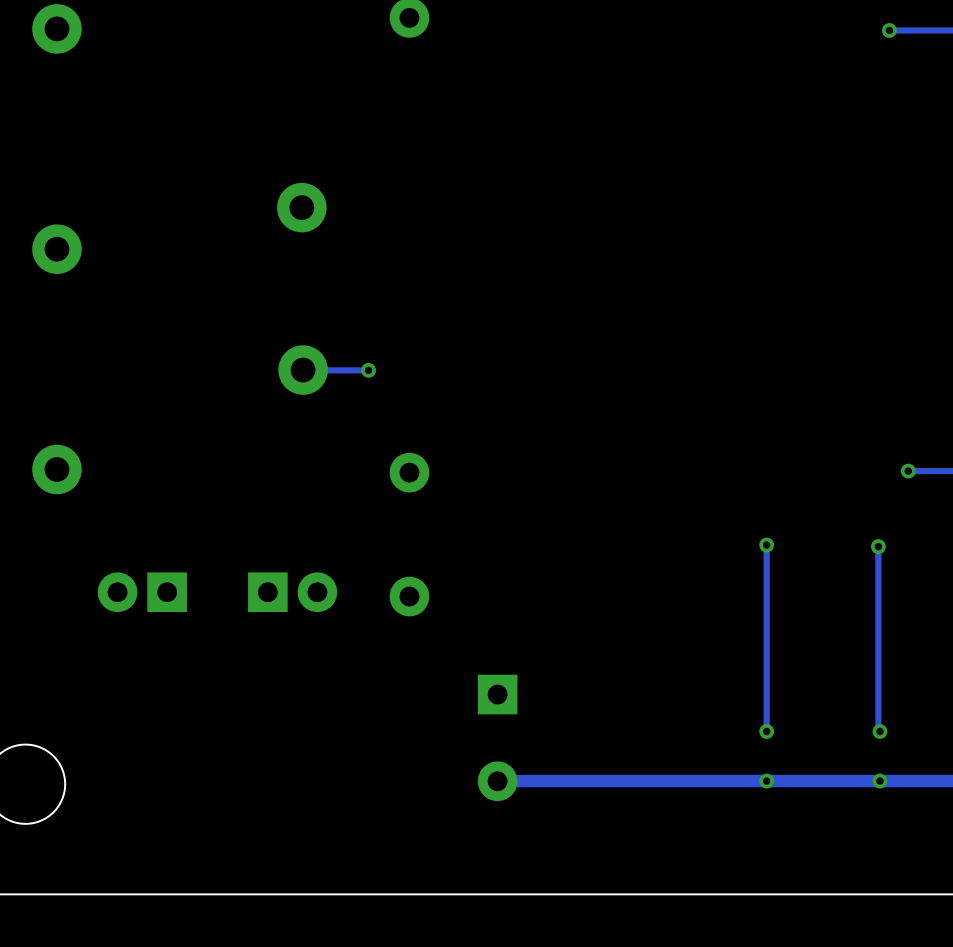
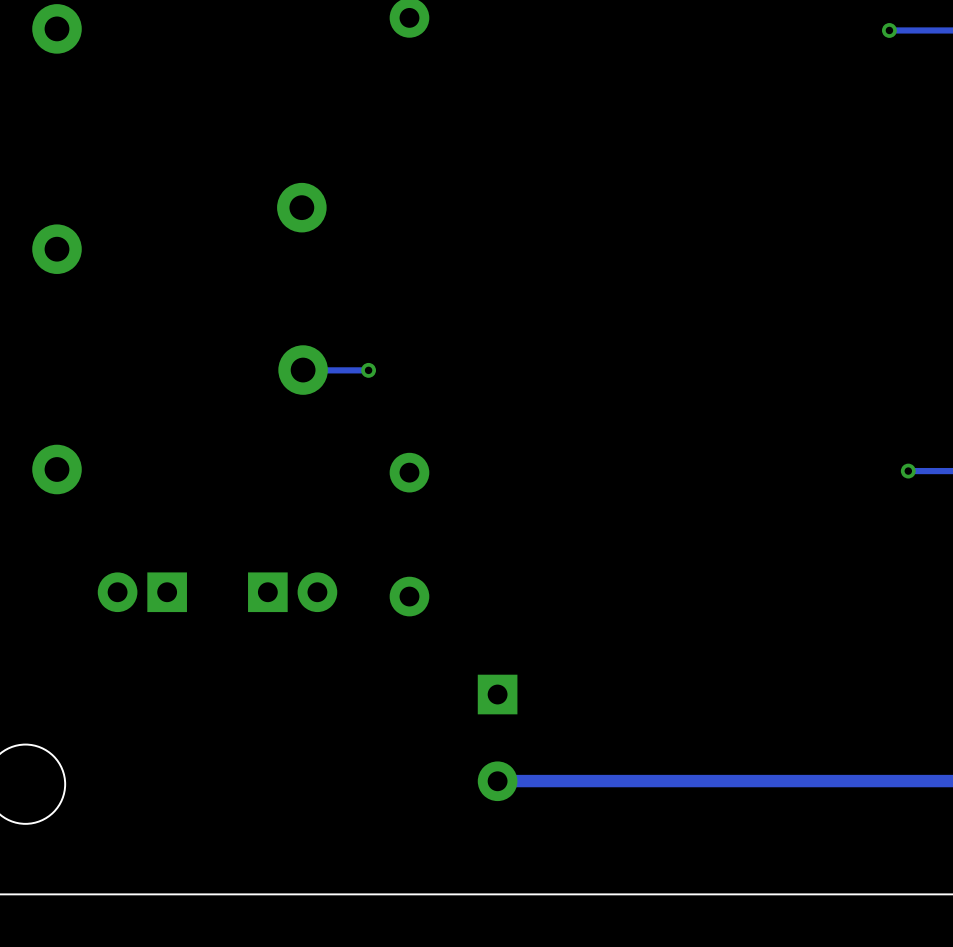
track: (766, 545) (766, 731) -> none
via: (766, 545) -> none
track: (878, 546) (878, 729) (879, 731) -> none
via: (878, 546) -> none
via: (766, 731) -> none
via: (879, 731) -> none
via: (766, 781) -> none
via: (879, 781) -> none

